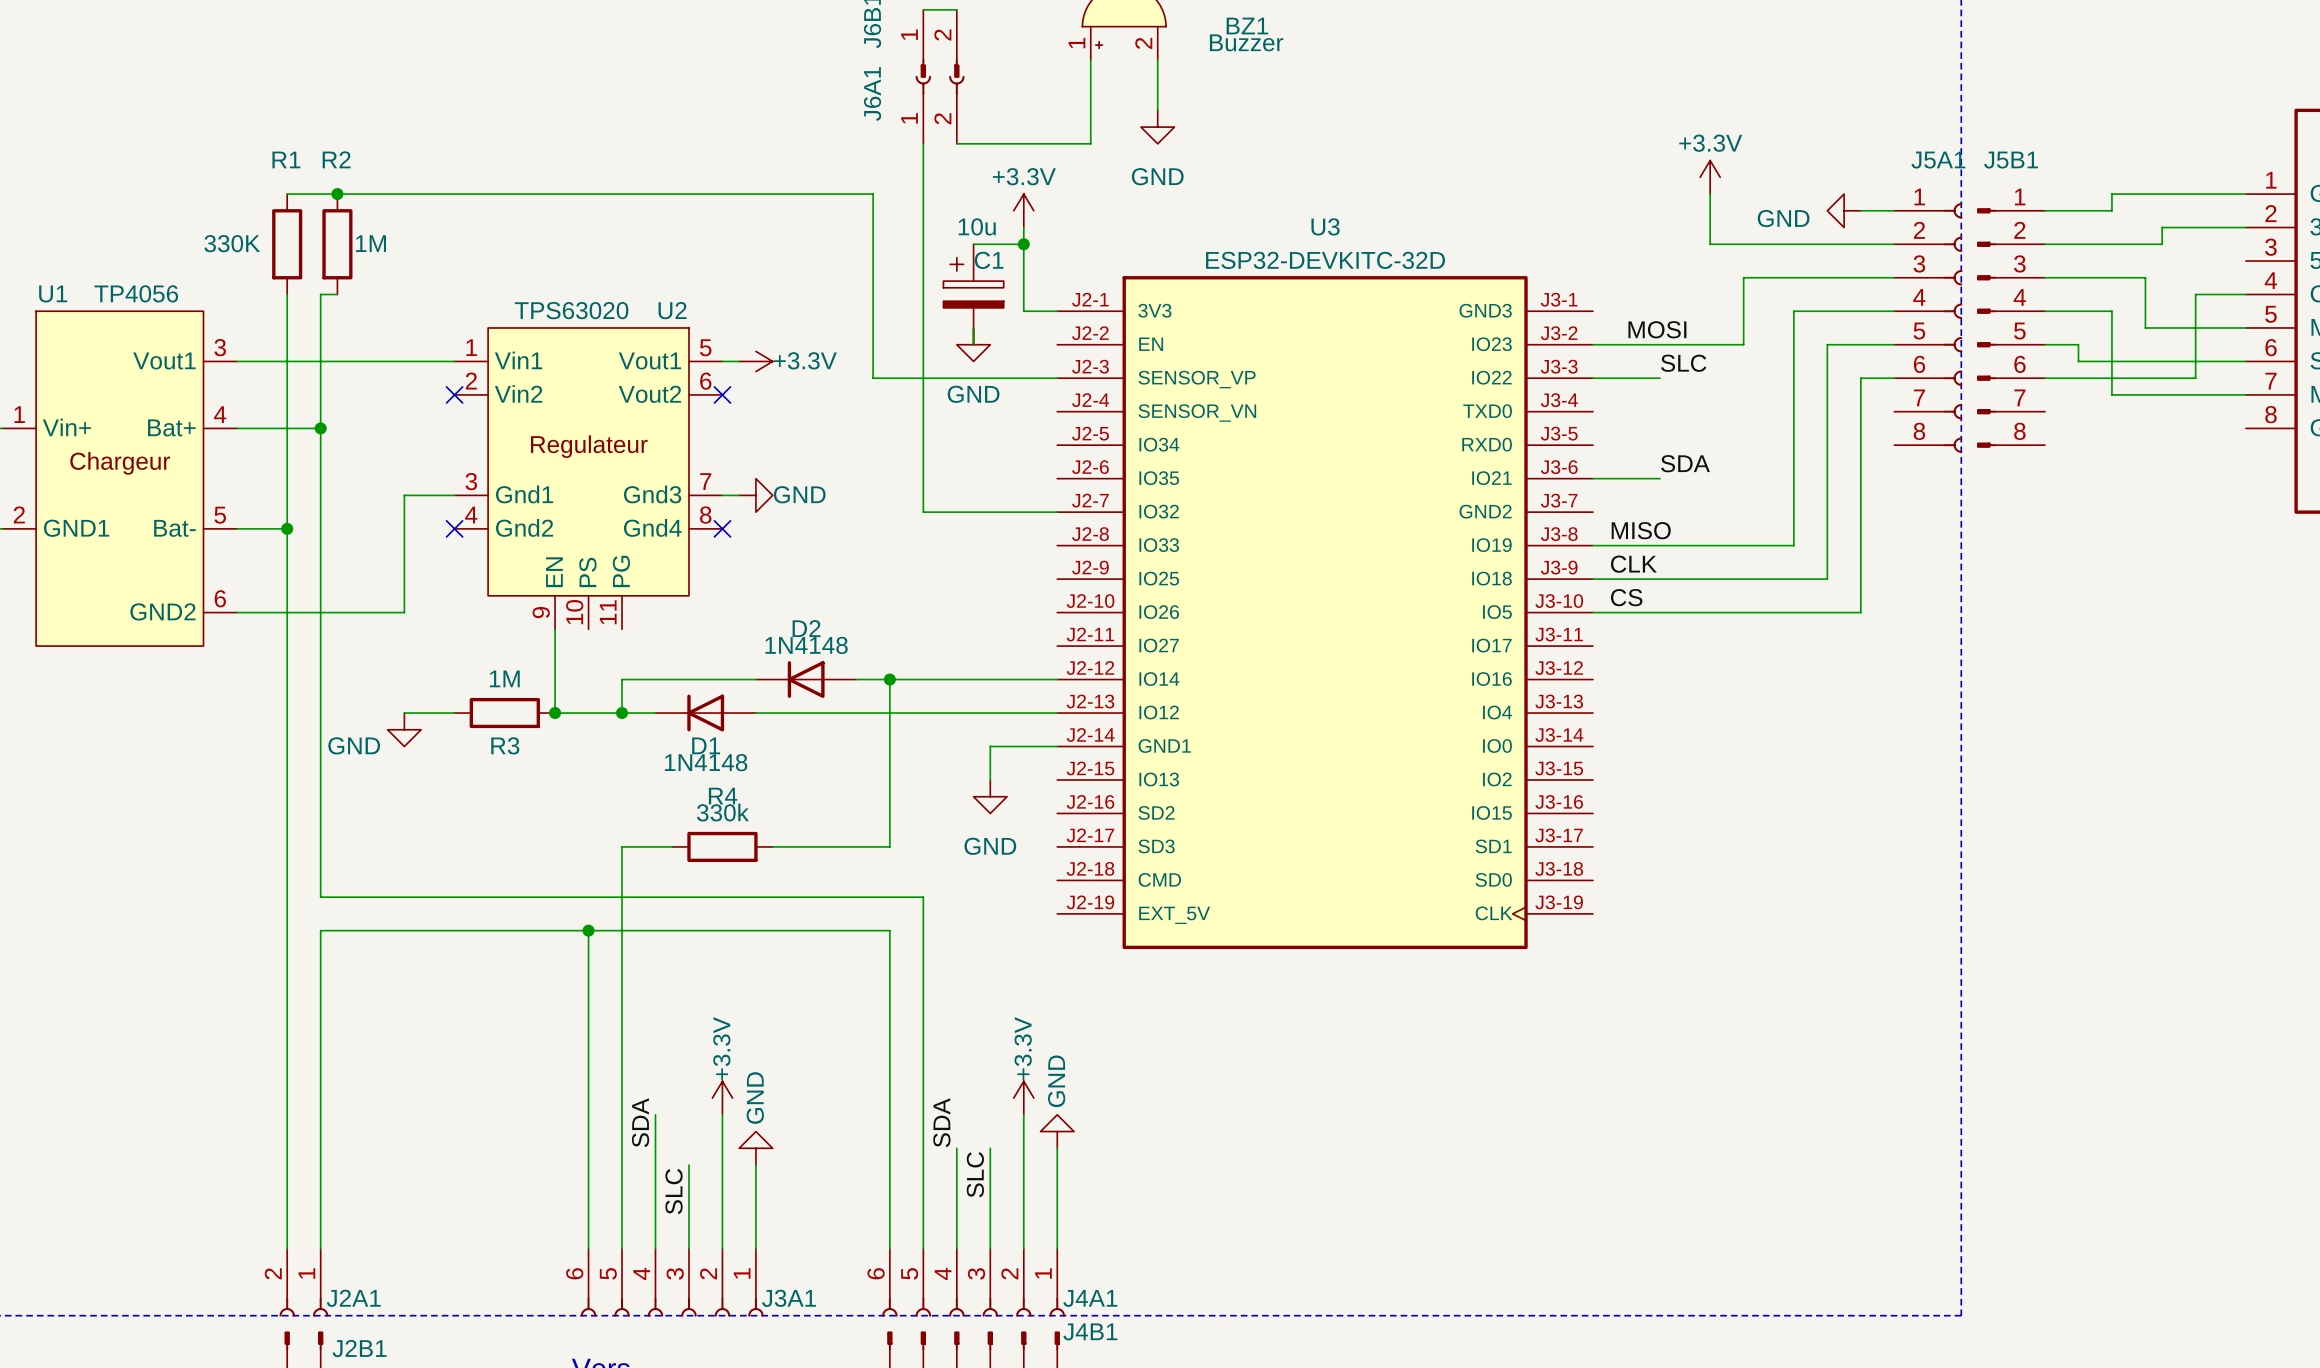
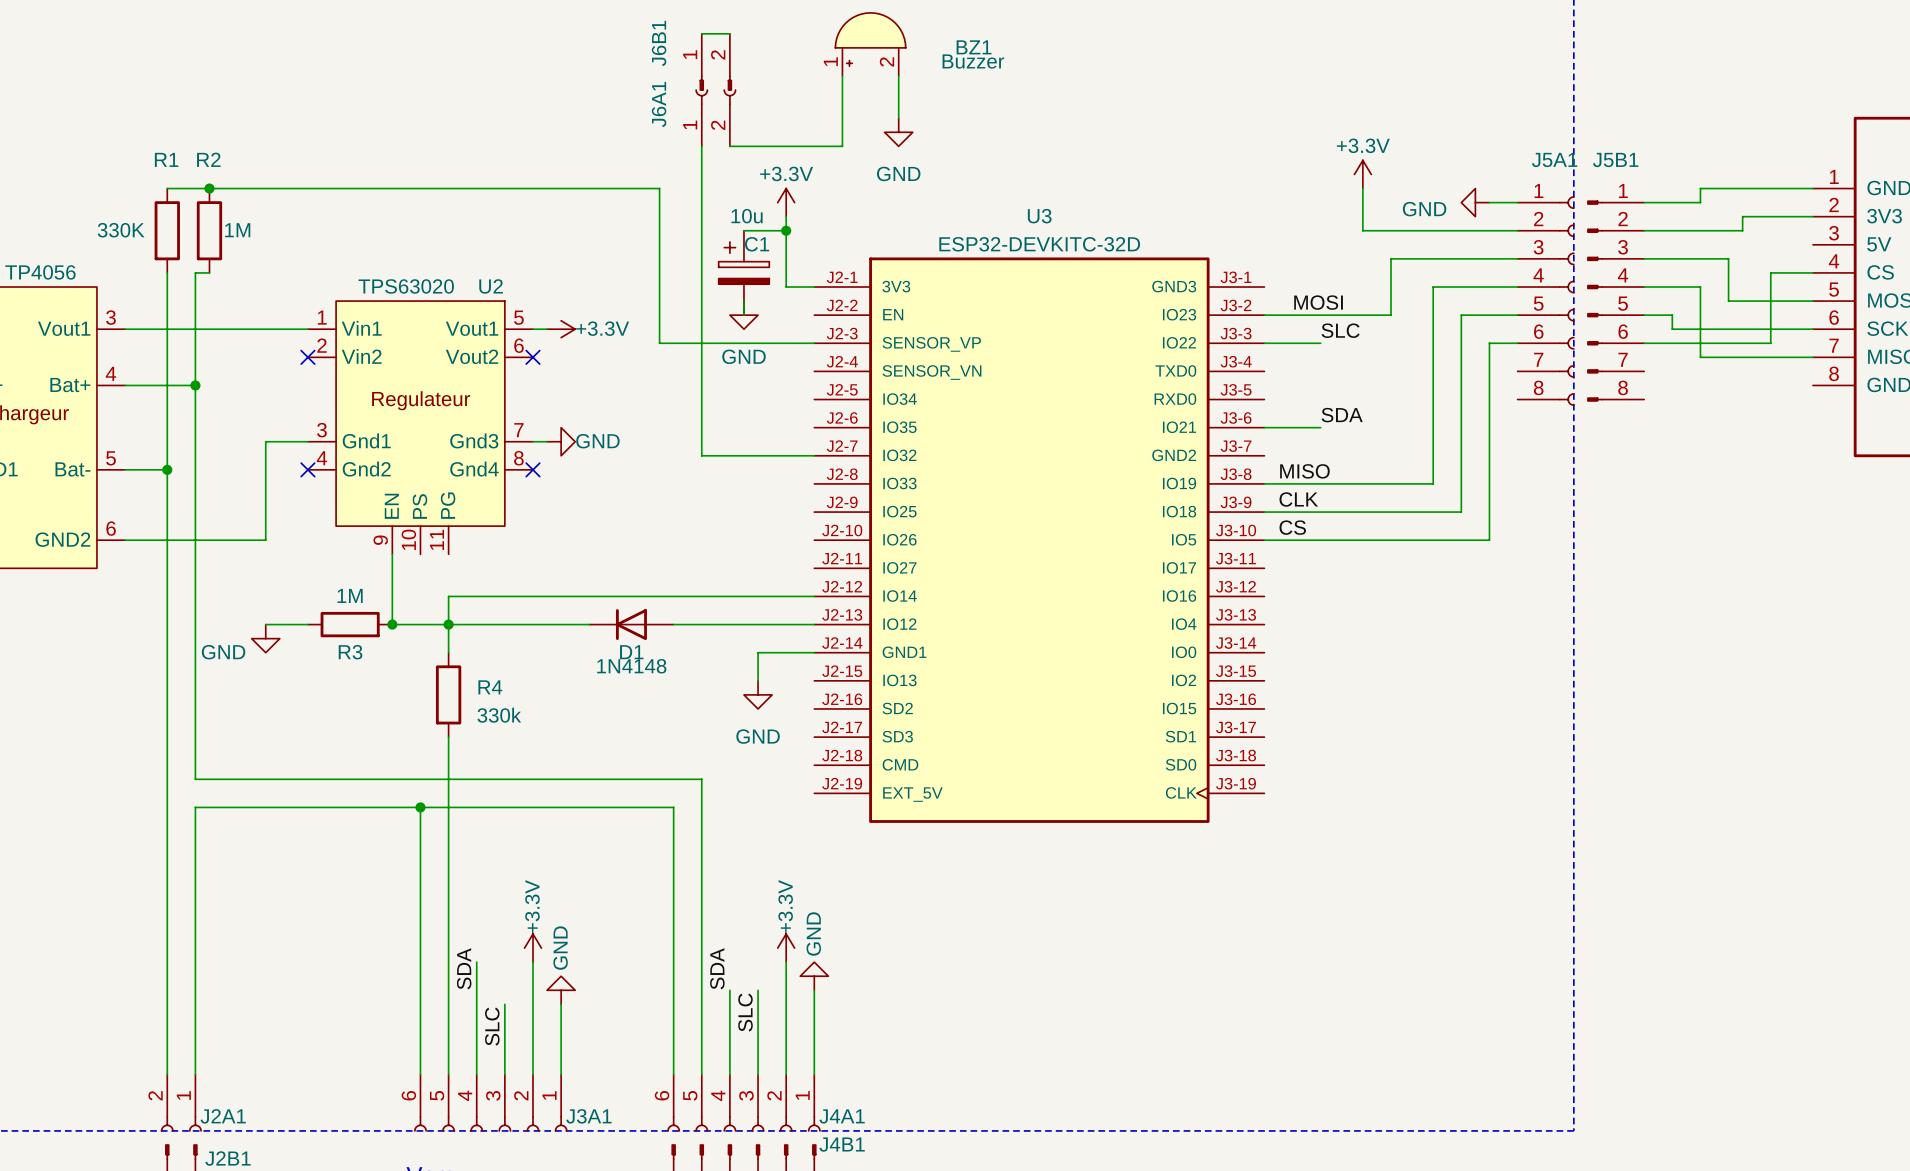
D2: 1N4148 (806, 679) -> none
wire: (889, 679) (889, 846) (772, 846) -> none
junction: (889, 679) -> none
wire: none -> (448, 624) (448, 652)
D1 position: (705, 713) -> (631, 624)
R4 value position: 330k (722, 812) -> 330k (499, 715)
wire: (622, 846) (672, 846) -> none
R4 rotation: 0° (722, 846) -> 90° clockwise (448, 694)
R4 position: (722, 846) -> (448, 694)

